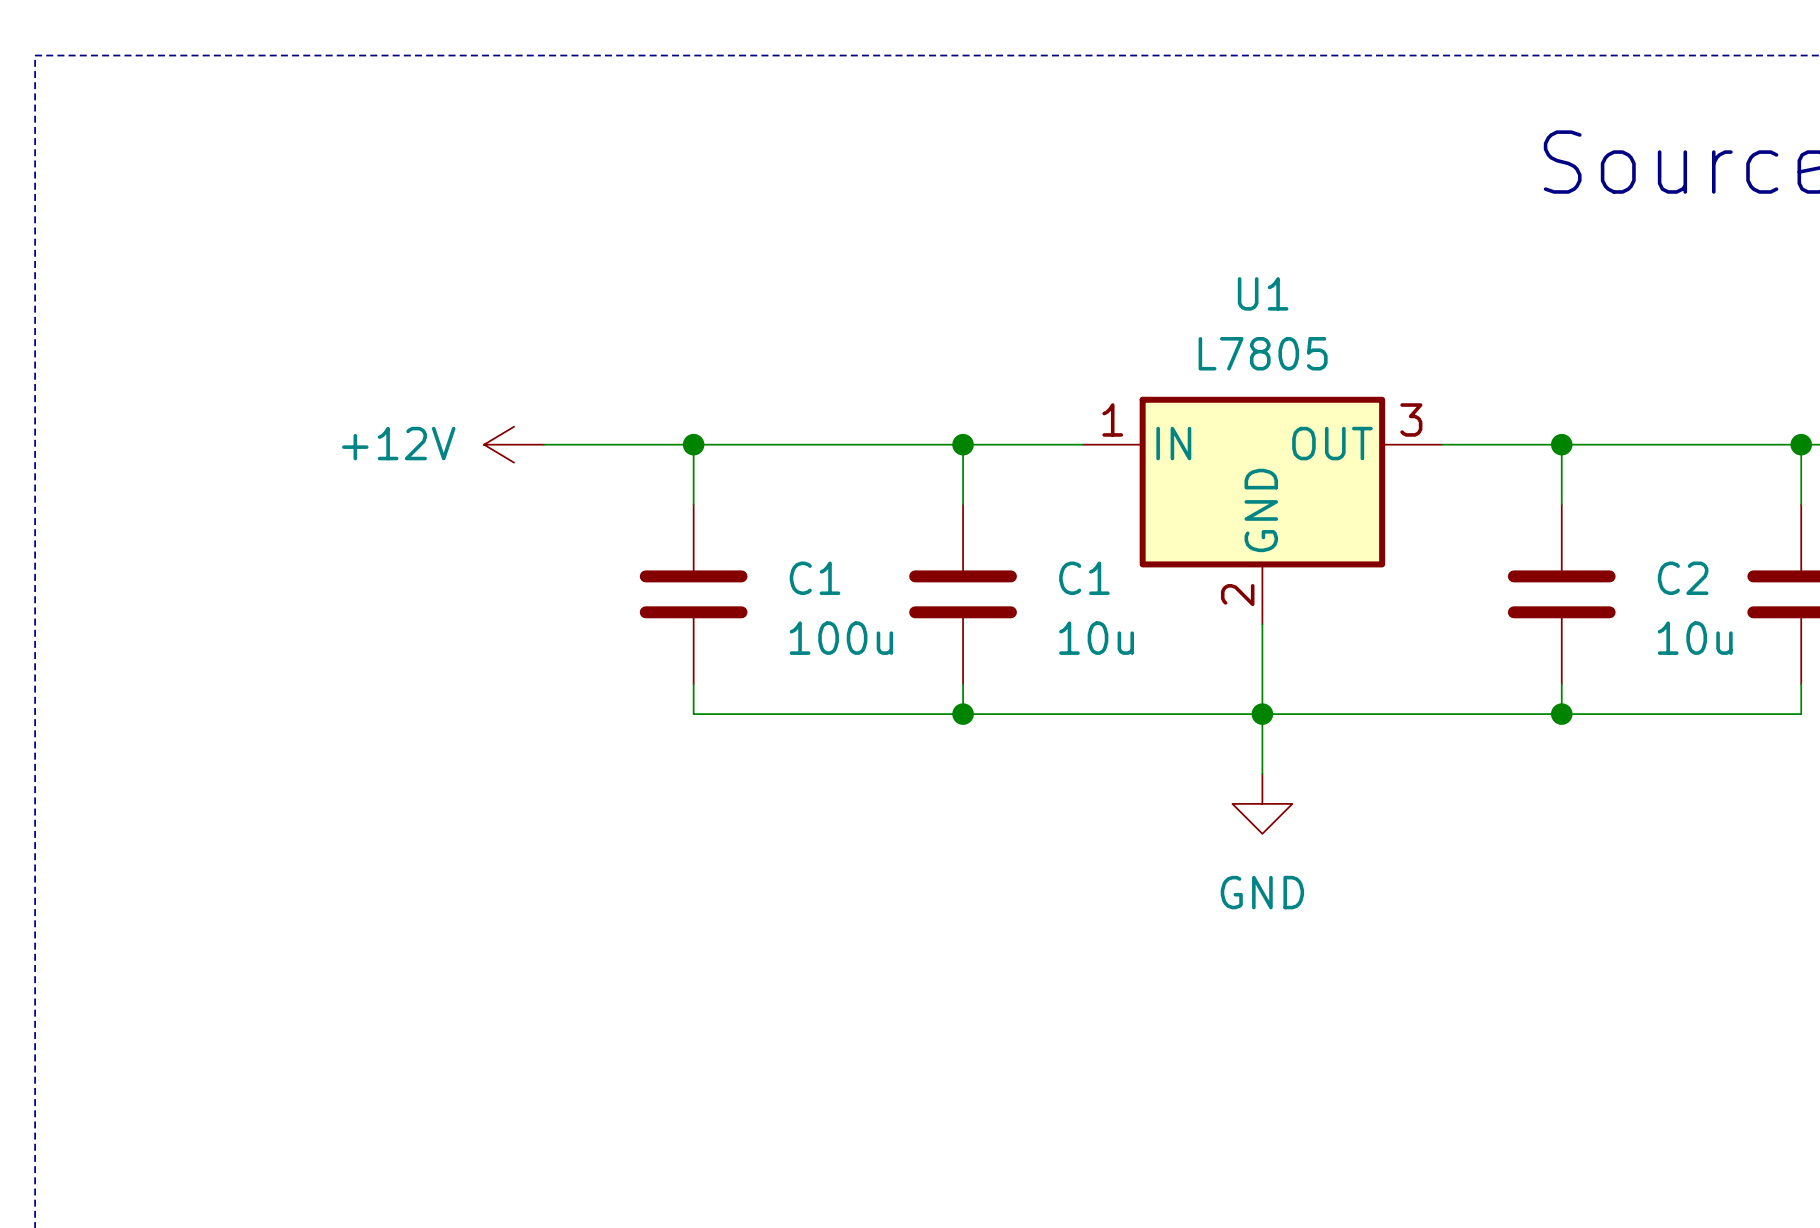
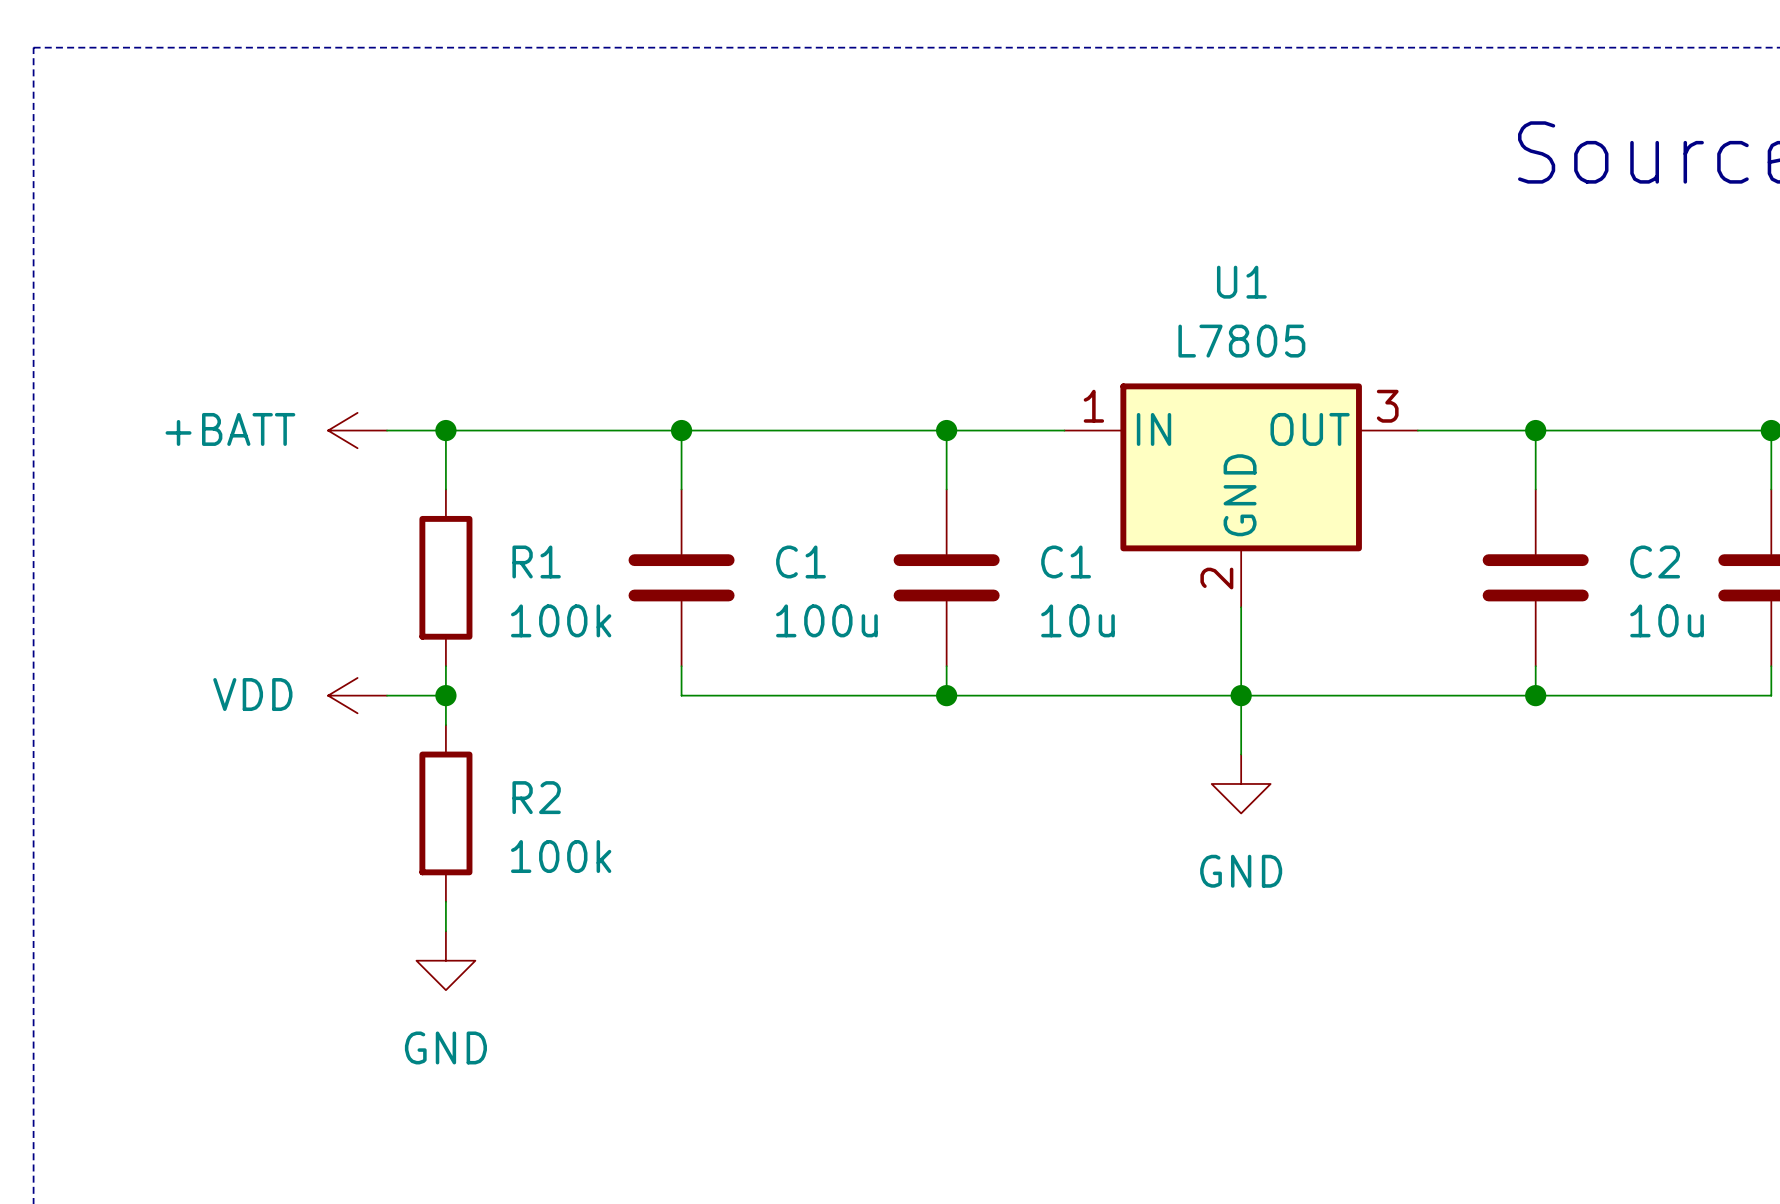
power symbol: none -> +BATT (357, 430)
wire: none -> (387, 430) (534, 430)
wire: none -> (445, 430) (445, 489)
junction: none -> (445, 430)
power symbol: +12V (514, 444) -> none
R1: none -> 100k (445, 577)
wire: none -> (445, 666) (445, 725)
power symbol: none -> VDD (357, 695)
wire: none -> (387, 695) (445, 695)
junction: none -> (445, 695)
R2: none -> 100k (445, 813)
wire: none -> (445, 901) (445, 931)
power symbol: none -> GND (445, 960)

